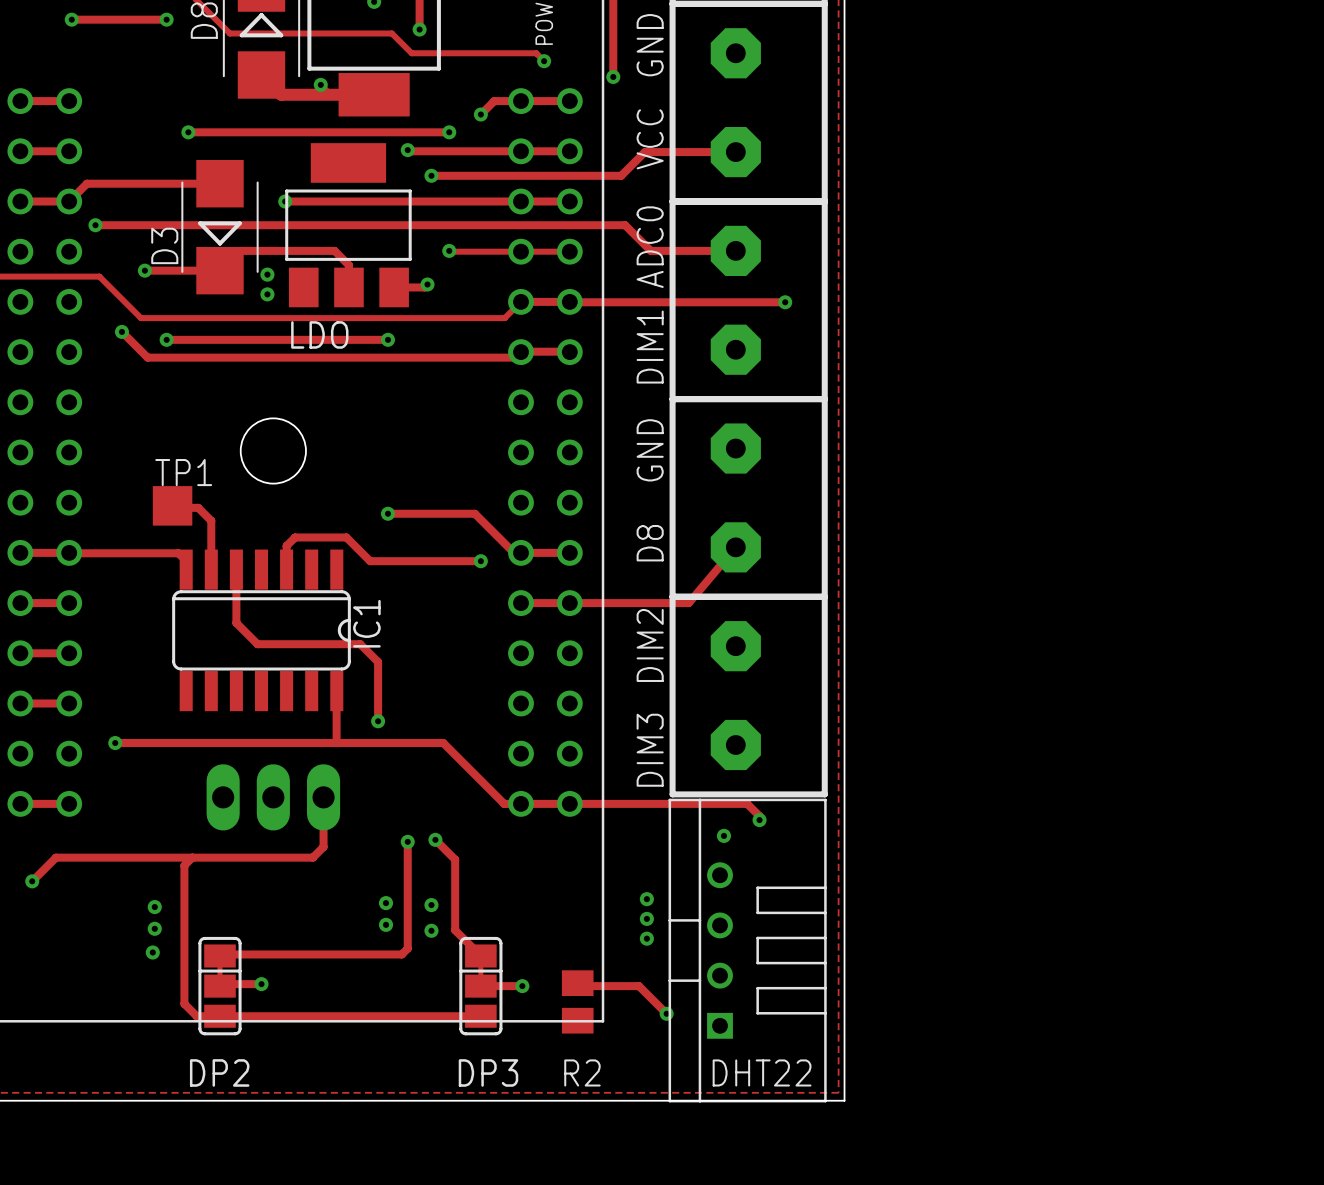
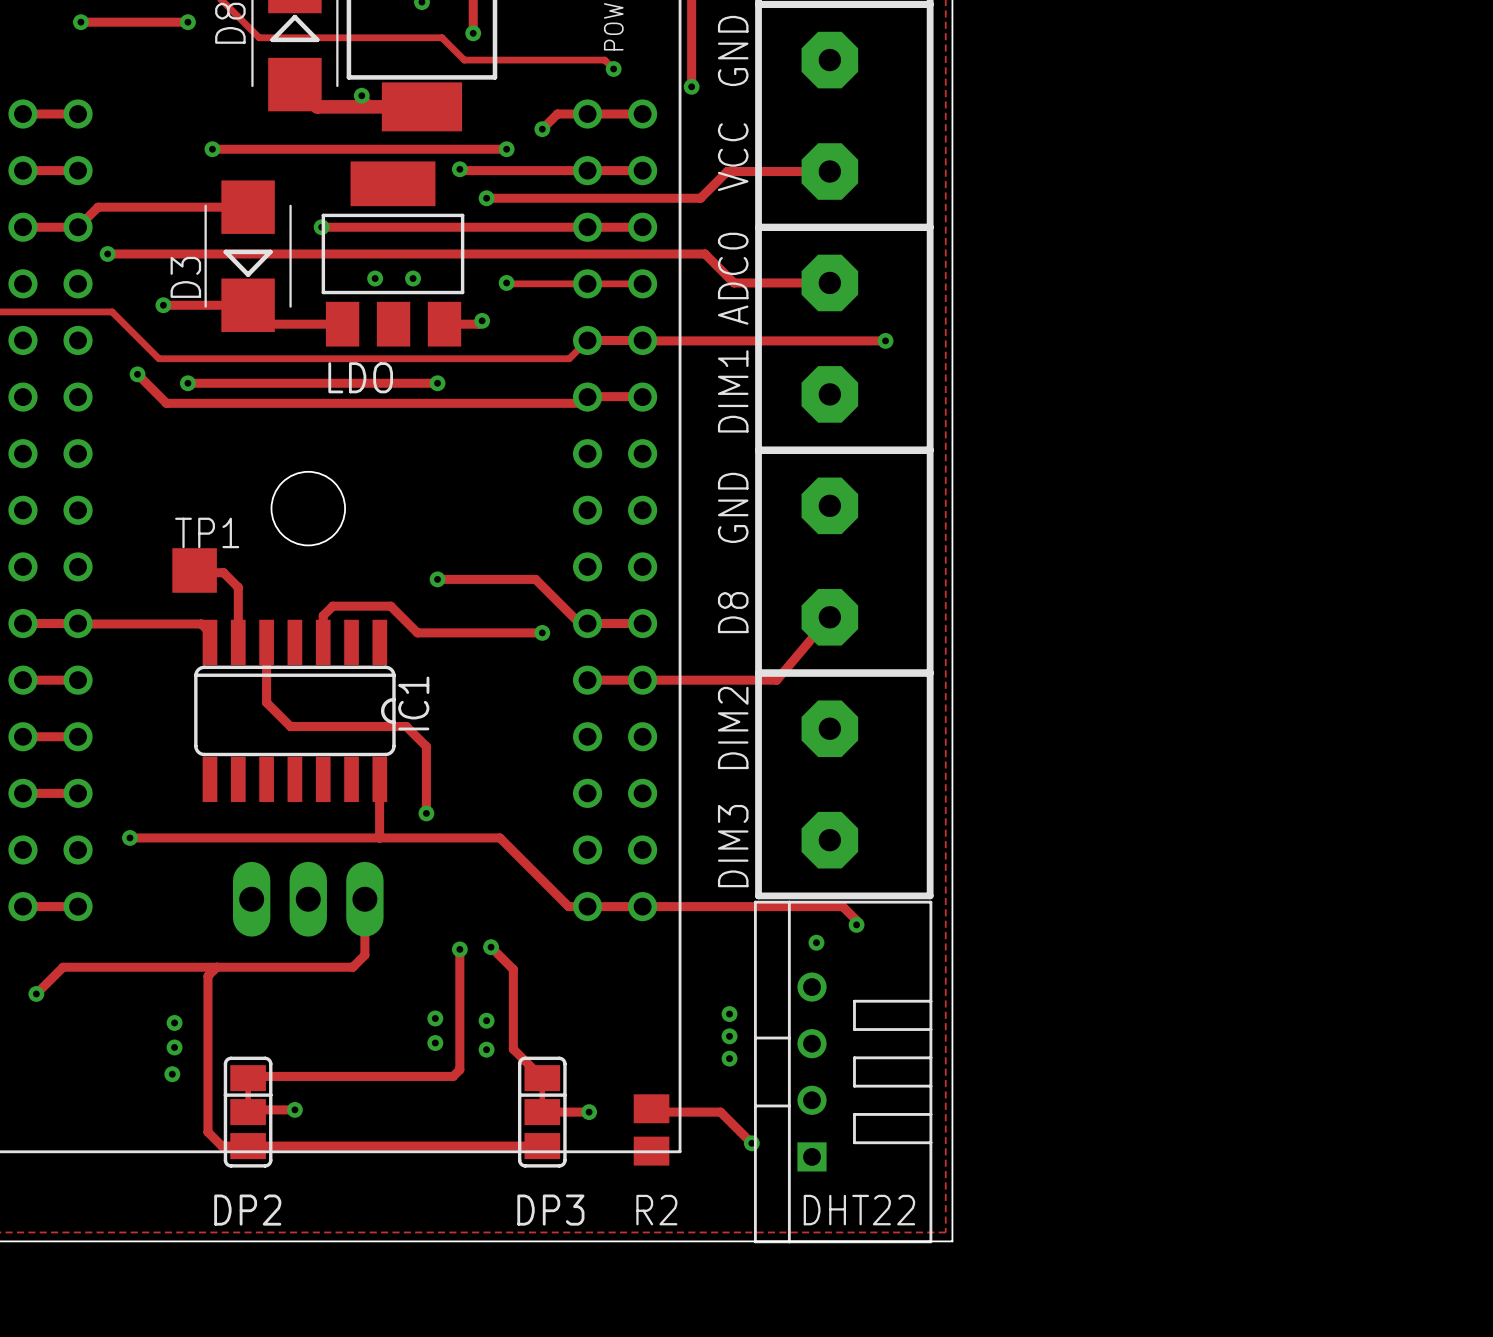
via: none -> (375, 278)
via: none -> (413, 278)
track: (219, 270) (239, 250) (334, 250) (348, 265) (348, 287) -> none
via: (267, 274) -> none
track: none -> (267, 324) (342, 324)
via: (267, 294) -> none

